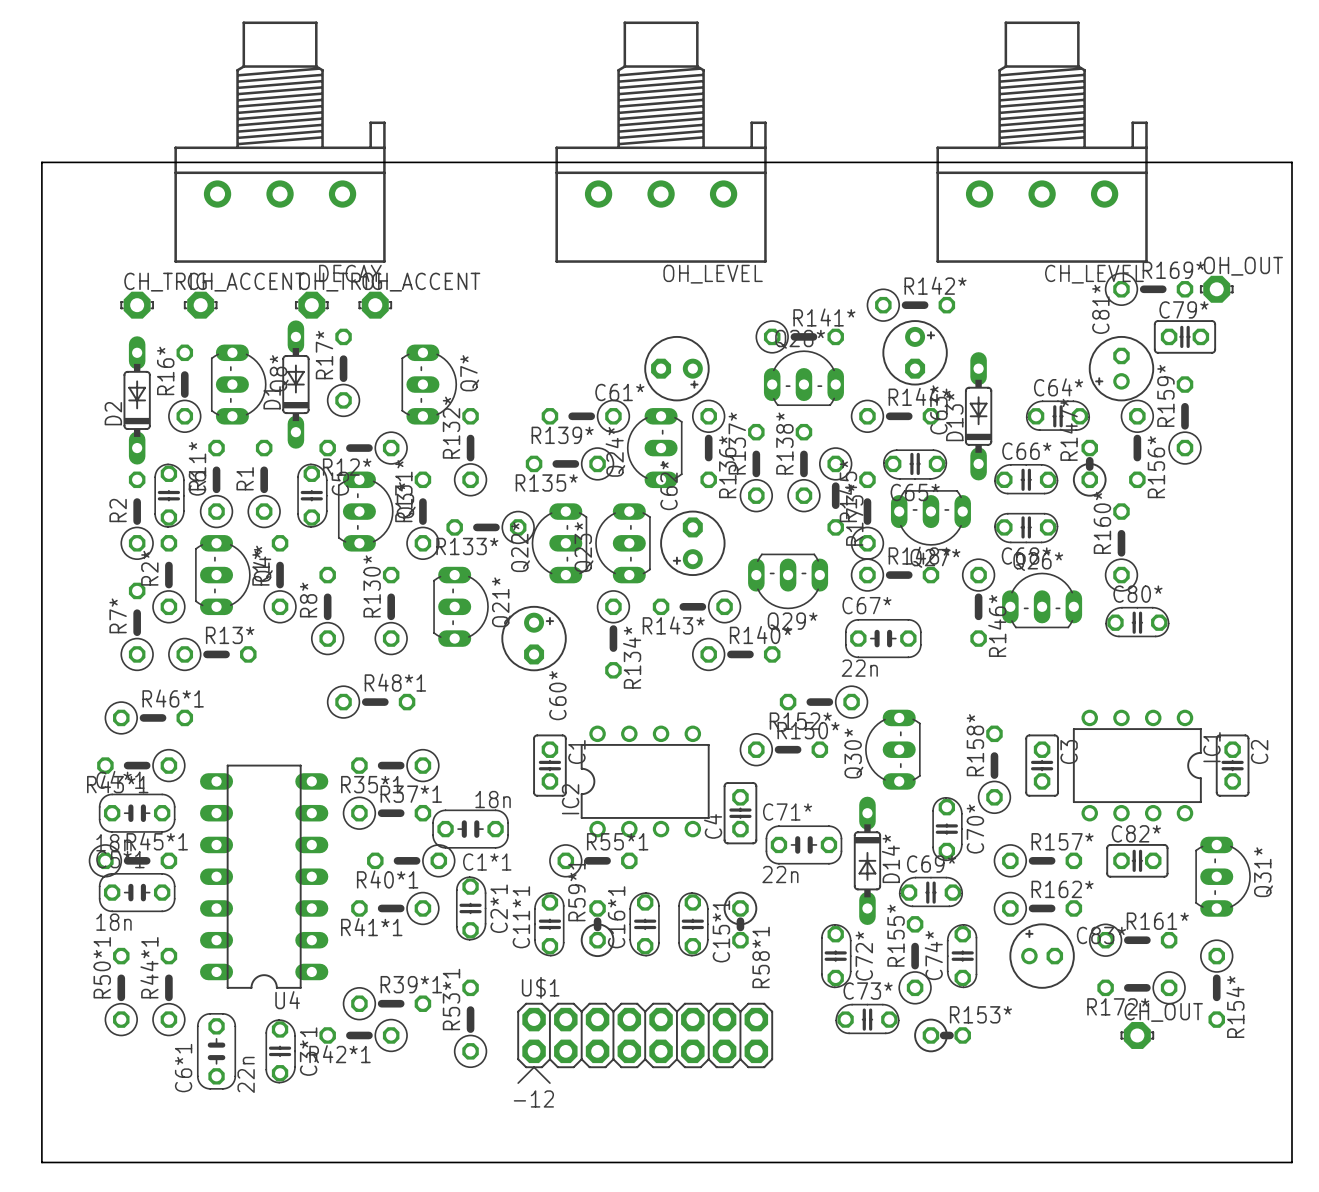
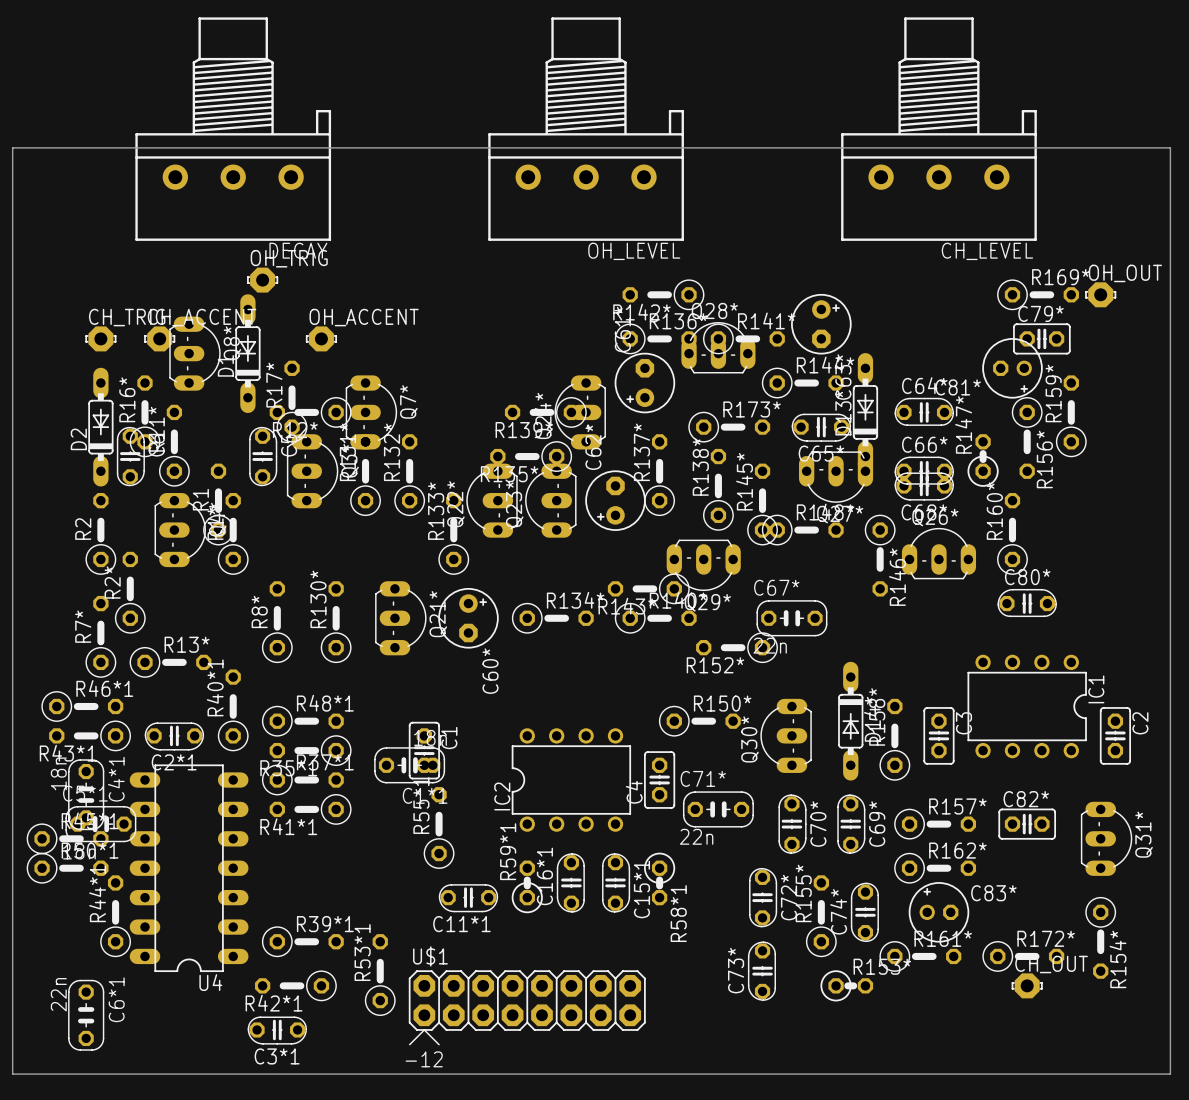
R169* position: (1149, 289) -> (1038, 294)
OH_OUT position: (1216, 289) -> (1100, 294)
CH_TRIG position: (137, 305) -> (100, 338)
CH_ACCENT position: (200, 305) -> (159, 338)
OH_ACCENT position: (375, 305) -> (321, 338)
R142* rotation: 0° (910, 305) -> 180° (663, 294)
R142* position: (910, 305) -> (663, 294)
R141* position: (799, 336) -> (744, 338)
C79* position: (1184, 336) -> (1041, 338)
C61* rotation: 0° (676, 368) -> 90° clockwise (644, 383)
C61* position: (676, 368) -> (644, 383)
C81* rotation: 0° (1121, 368) -> 90° counterclockwise (1012, 368)
R17* position: (343, 372) -> (292, 401)
Q7* position: (429, 384) -> (371, 412)
R16* position: (184, 388) -> (144, 416)
D2 position: (137, 400) -> (100, 427)
C64* position: (1057, 415) -> (924, 411)
R139* position: (585, 416) -> (545, 412)
D13* position: (978, 416) -> (865, 412)
R159* position: (1184, 420) -> (1071, 416)
R136* rotation: 0° (708, 443) -> 90° counterclockwise (655, 338)
R136* position: (708, 443) -> (655, 338)
R156* position: (1137, 443) -> (1027, 438)
R132* position: (470, 452) -> (409, 475)
R135* position: (569, 463) -> (531, 456)
R137* position: (756, 468) -> (659, 475)
R138* position: (803, 468) -> (718, 489)
R147* position: (1089, 468) -> (983, 460)
C66* position: (1026, 479) -> (924, 470)
R1 position: (264, 483) -> (218, 504)
R173* rotation: 0° (835, 491) -> 90° counterclockwise (729, 427)
R2 position: (137, 515) -> (100, 533)
R145* position: (867, 515) -> (762, 504)
R133* rotation: 0° (490, 527) -> 90° clockwise (453, 533)
R133* position: (490, 527) -> (453, 533)
R160* position: (1121, 547) -> (1012, 533)
R2* position: (168, 579) -> (130, 592)
Q29* position: (788, 581) -> (703, 565)
Q21* position: (461, 606) -> (400, 618)
R143* position: (696, 606) -> (648, 588)
R8* position: (327, 610) -> (277, 622)
R130* position: (391, 610) -> (336, 622)
C80* position: (1137, 622) -> (1027, 602)
R7* position: (137, 626) -> (100, 636)
R134* rotation: 0° (613, 634) -> 90° counterclockwise (552, 618)
C60* position: (534, 638) -> (468, 618)
C67* position: (883, 638) -> (791, 618)
R13* position: (212, 654) -> (170, 662)
R140* position: (736, 654) -> (655, 618)
R48*1 position: (371, 702) -> (302, 721)
R46*1 position: (148, 717) -> (82, 706)
R150* position: (783, 749) -> (699, 721)
Q30* position: (892, 749) -> (786, 735)
R43*1 position: (141, 765) -> (90, 735)
R35*1 position: (395, 765) -> (310, 750)
C1 position: (549, 765) -> (424, 750)
C3 position: (1042, 765) -> (938, 735)
C2 position: (1232, 765) -> (1115, 735)
R158* position: (994, 769) -> (894, 739)
IC2 position: (645, 781) -> (571, 780)
C4*1 rotation: 0° (137, 813) -> 90° clockwise (86, 794)
C4*1 position: (137, 813) -> (86, 794)
R37*1 position: (387, 813) -> (302, 780)
C4 position: (740, 813) -> (659, 780)
C70* position: (947, 829) -> (792, 824)
C71* position: (803, 844) -> (718, 809)
R45*1 position: (133, 860) -> (67, 838)
R40*1 rotation: 0° (411, 860) -> 90° clockwise (233, 710)
R40*1 position: (411, 860) -> (233, 710)
R55*1 rotation: 0° (593, 860) -> 90° counterclockwise (439, 827)
R55*1 position: (593, 860) -> (439, 827)
D14* position: (867, 860) -> (850, 721)
R157* position: (1037, 860) -> (935, 824)
C82* position: (1137, 860) -> (1027, 824)
U4 position: (264, 876) -> (189, 868)
Q31* position: (1223, 876) -> (1106, 838)
C69* rotation: 0° (930, 891) -> 90° clockwise (851, 824)
R41*1 position: (395, 908) -> (310, 809)
C2*1 rotation: 0° (471, 908) -> 90° clockwise (174, 736)
C2*1 position: (471, 908) -> (174, 736)
R162* position: (1037, 908) -> (935, 868)
R58*1 position: (740, 920) -> (659, 878)
C11*1 rotation: 0° (549, 924) -> 90° counterclockwise (468, 898)
C11*1 position: (549, 924) -> (468, 898)
C16*1 position: (644, 924) -> (570, 882)
C15*1 position: (693, 924) -> (616, 882)
R59*1 position: (597, 928) -> (527, 886)
R161* position: (1133, 940) -> (920, 956)
C72* position: (836, 956) -> (763, 897)
C74* position: (962, 956) -> (864, 912)
C83* position: (1042, 956) -> (938, 912)
R155* position: (915, 960) -> (821, 916)
R154* position: (1216, 983) -> (1100, 937)
R172* rotation: 0° (1141, 987) -> 180° (1023, 956)
R50*1 rotation: 0° (121, 991) -> 90° clockwise (67, 868)
R50*1 position: (121, 991) -> (67, 868)
R44*1 position: (168, 991) -> (115, 916)
R39*1 position: (387, 1003) -> (302, 941)
C73* rotation: 0° (867, 1018) -> 90° counterclockwise (761, 971)
R53*1 position: (470, 1023) -> (380, 974)
R42*1 position: (363, 1035) -> (295, 985)
R153* position: (942, 1035) -> (846, 985)
CH_OUT position: (1137, 1035) -> (1027, 985)
U$1 position: (645, 1043) -> (527, 1007)
C6*1 position: (216, 1051) -> (86, 1015)
C3*1 rotation: 0° (280, 1051) -> 90° clockwise (277, 1030)
C3*1 position: (280, 1051) -> (277, 1030)
C6*1 name position: C6*1 (183, 1068) -> C6*1 (116, 999)
C6*1 value position: 22n (246, 1074) -> 22n (58, 994)

